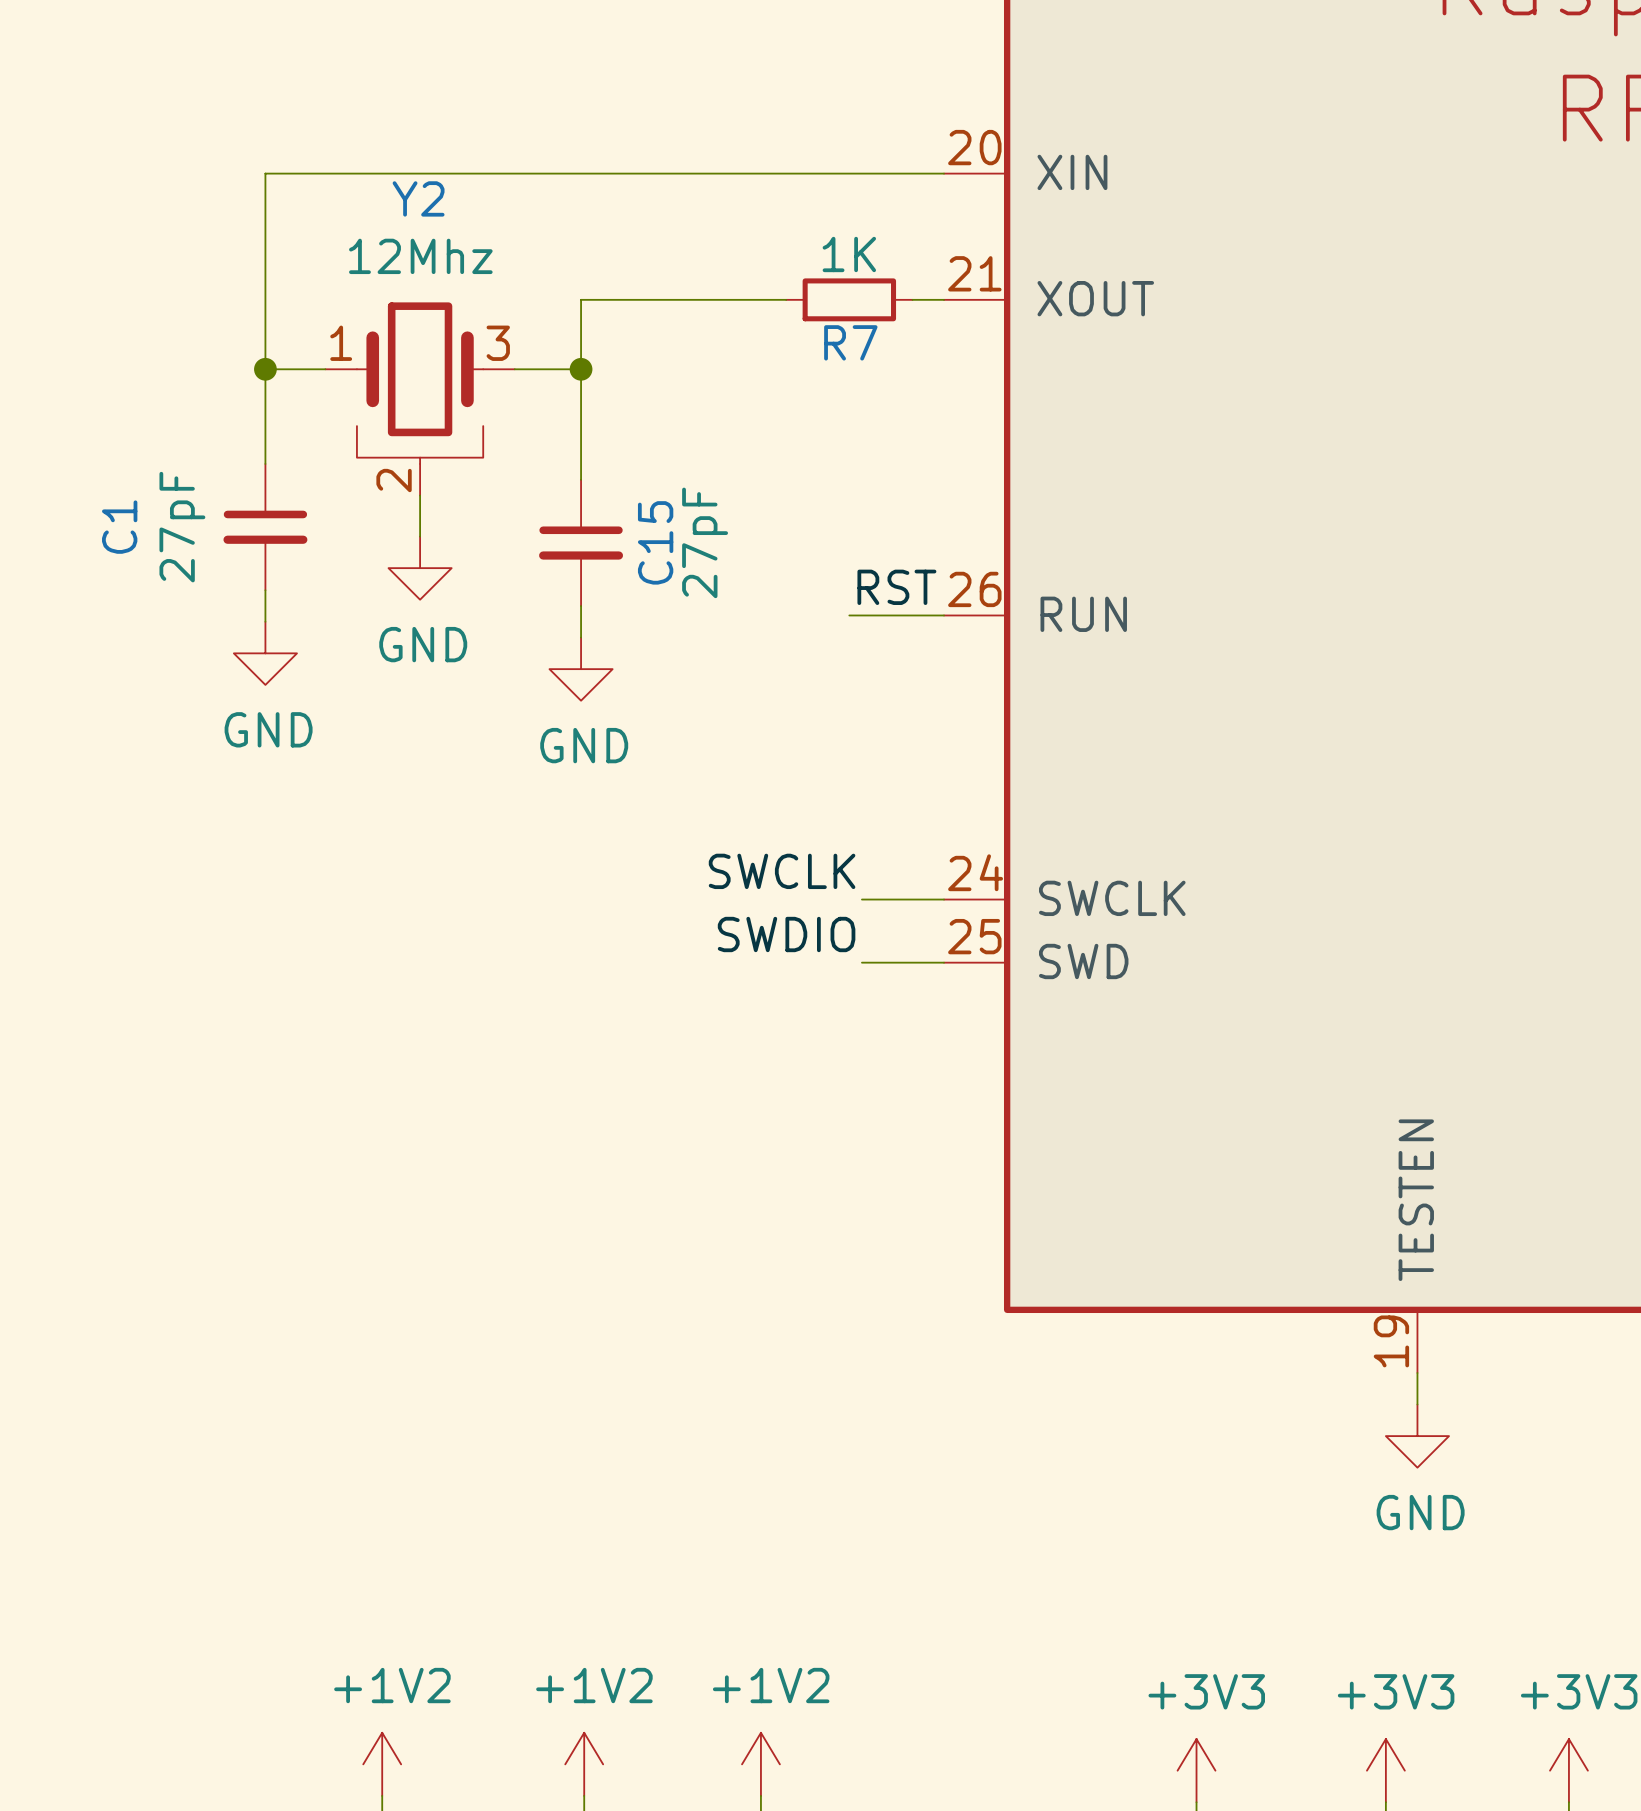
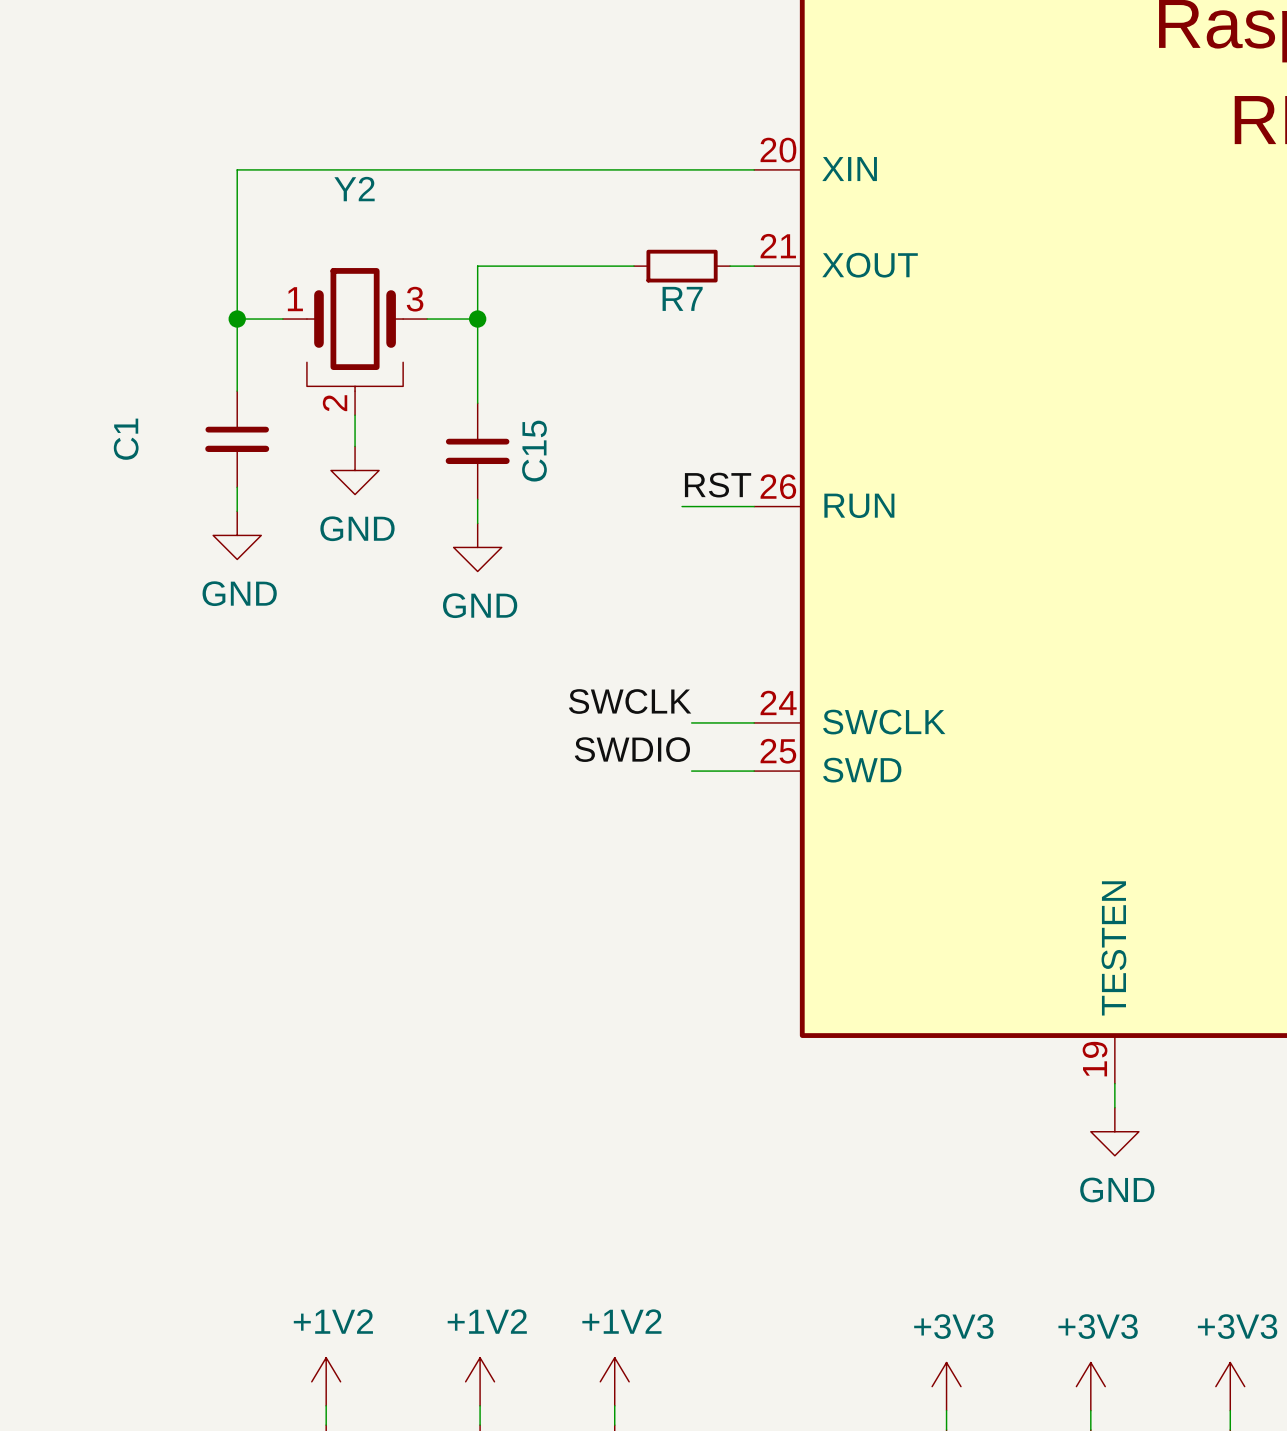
R7 value: 1K (849, 254) -> none
Y2 value: 12Mhz (420, 256) -> none
C1 value: 27pF (182, 527) -> none
C15 value: 27pF (705, 542) -> none

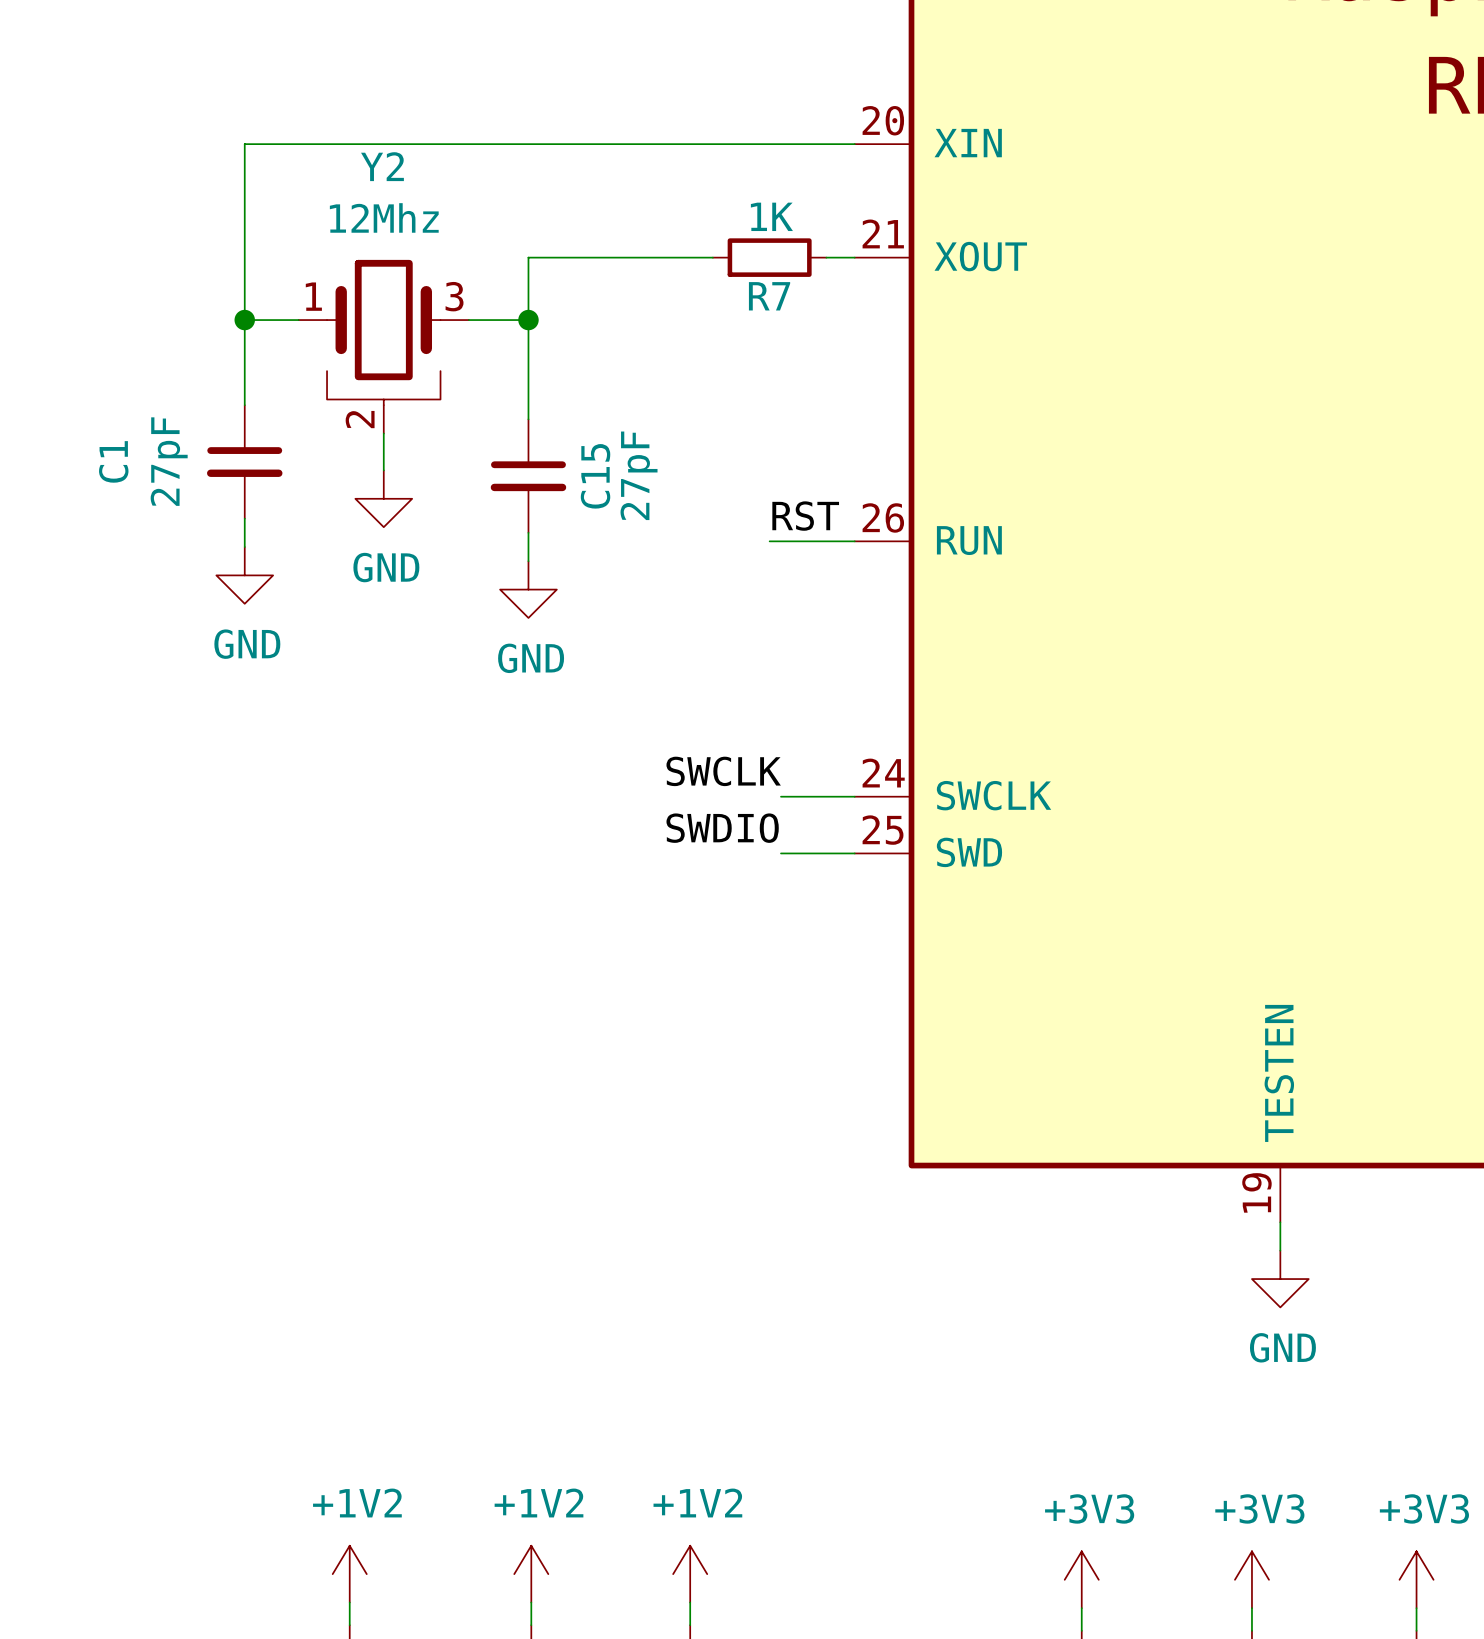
R7 value: none -> 1K (771, 216)
Y2 value: none -> 12Mhz (384, 217)
C1 value: none -> 27pF (169, 461)
C15 value: none -> 27pF (639, 475)

